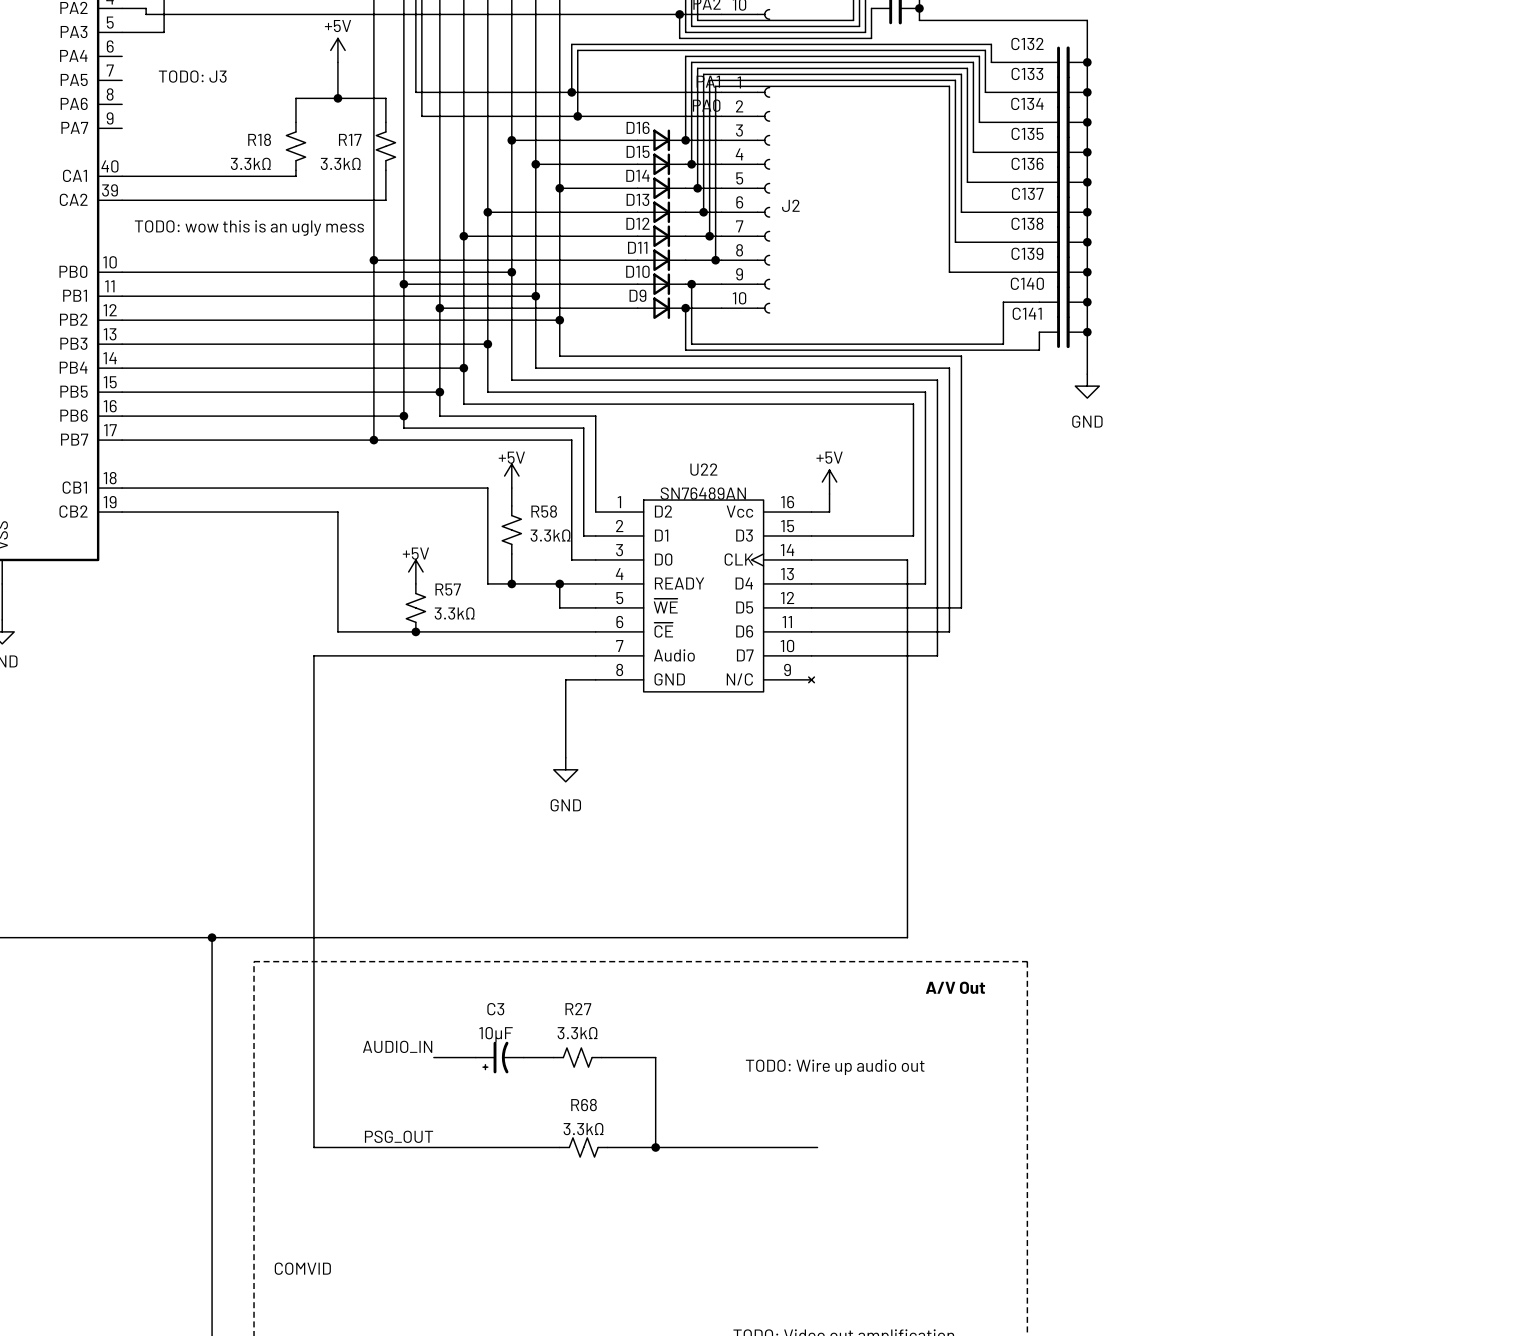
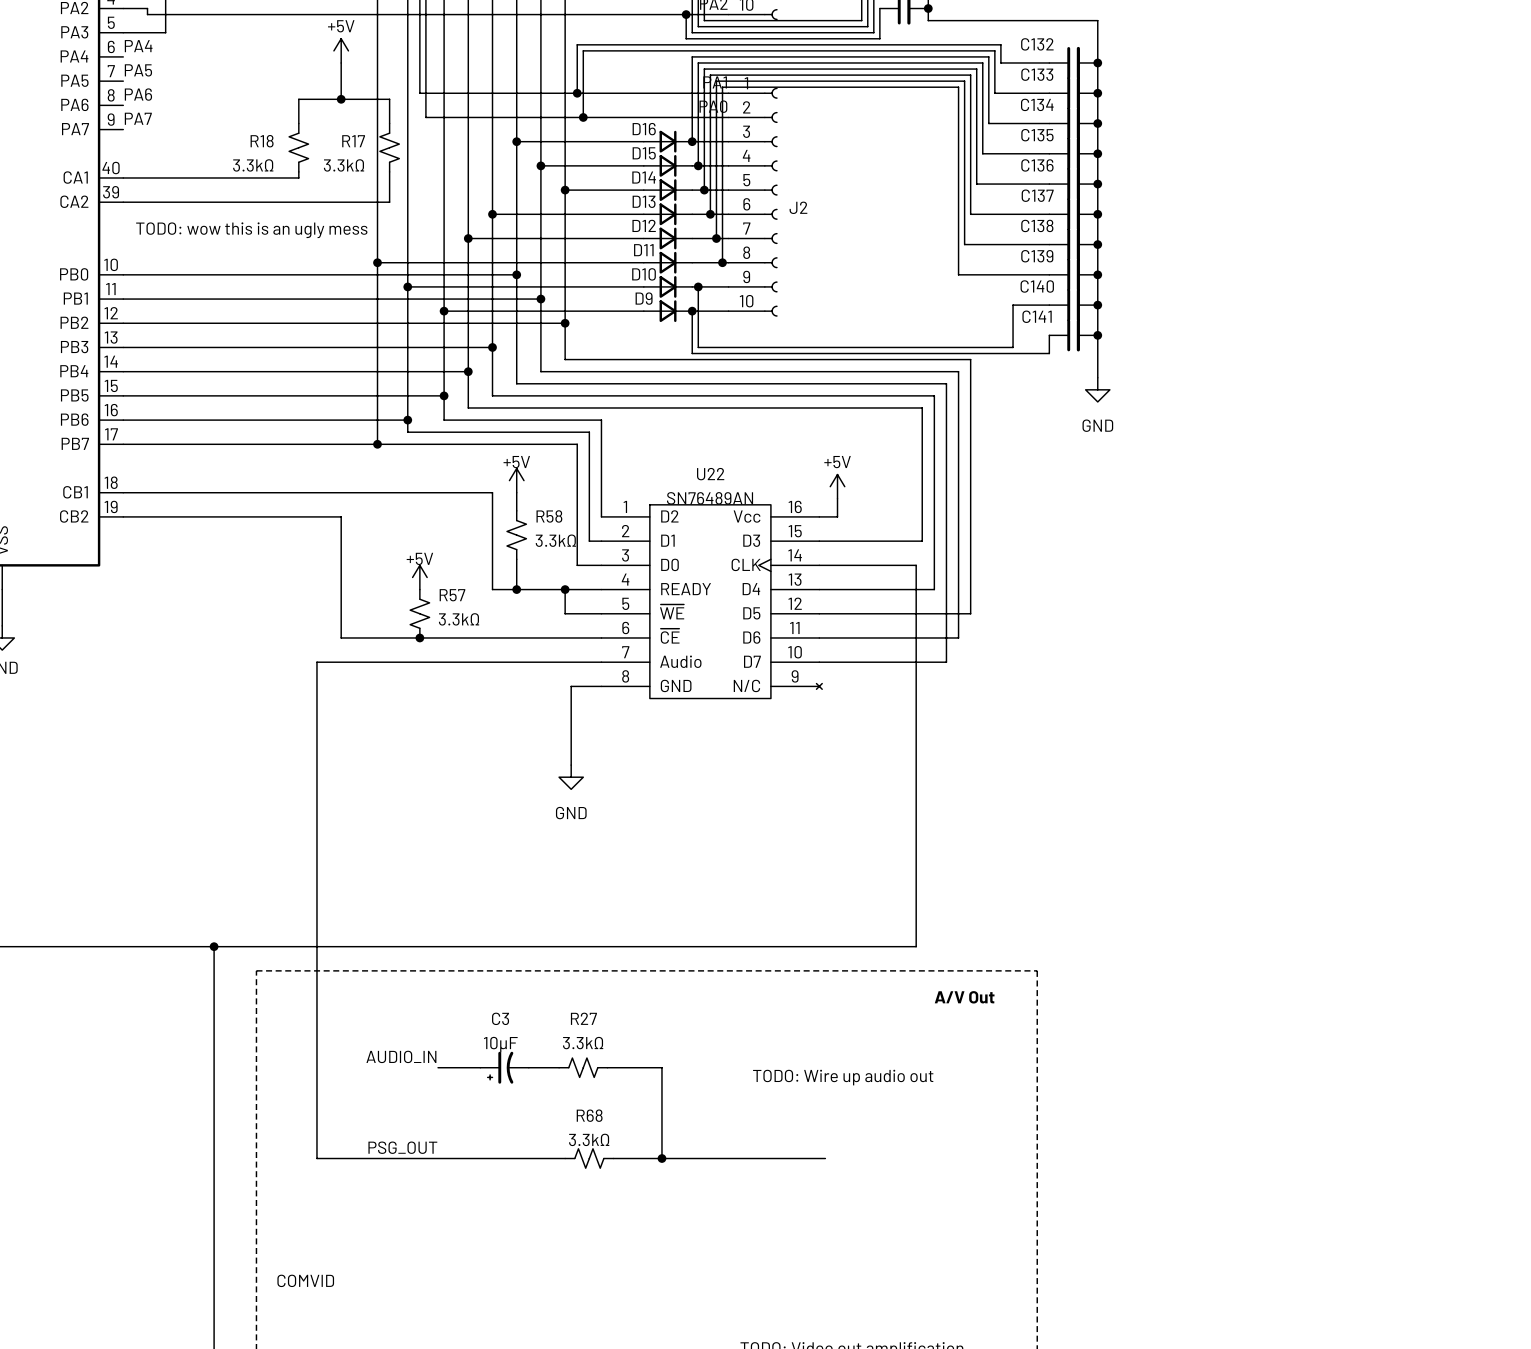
label: none -> PA4 (138, 46)
label: none -> PA5 (138, 70)
text: TODO: J3 (192, 76) -> none
label: none -> PA6 (138, 94)
label: none -> PA7 (138, 118)

